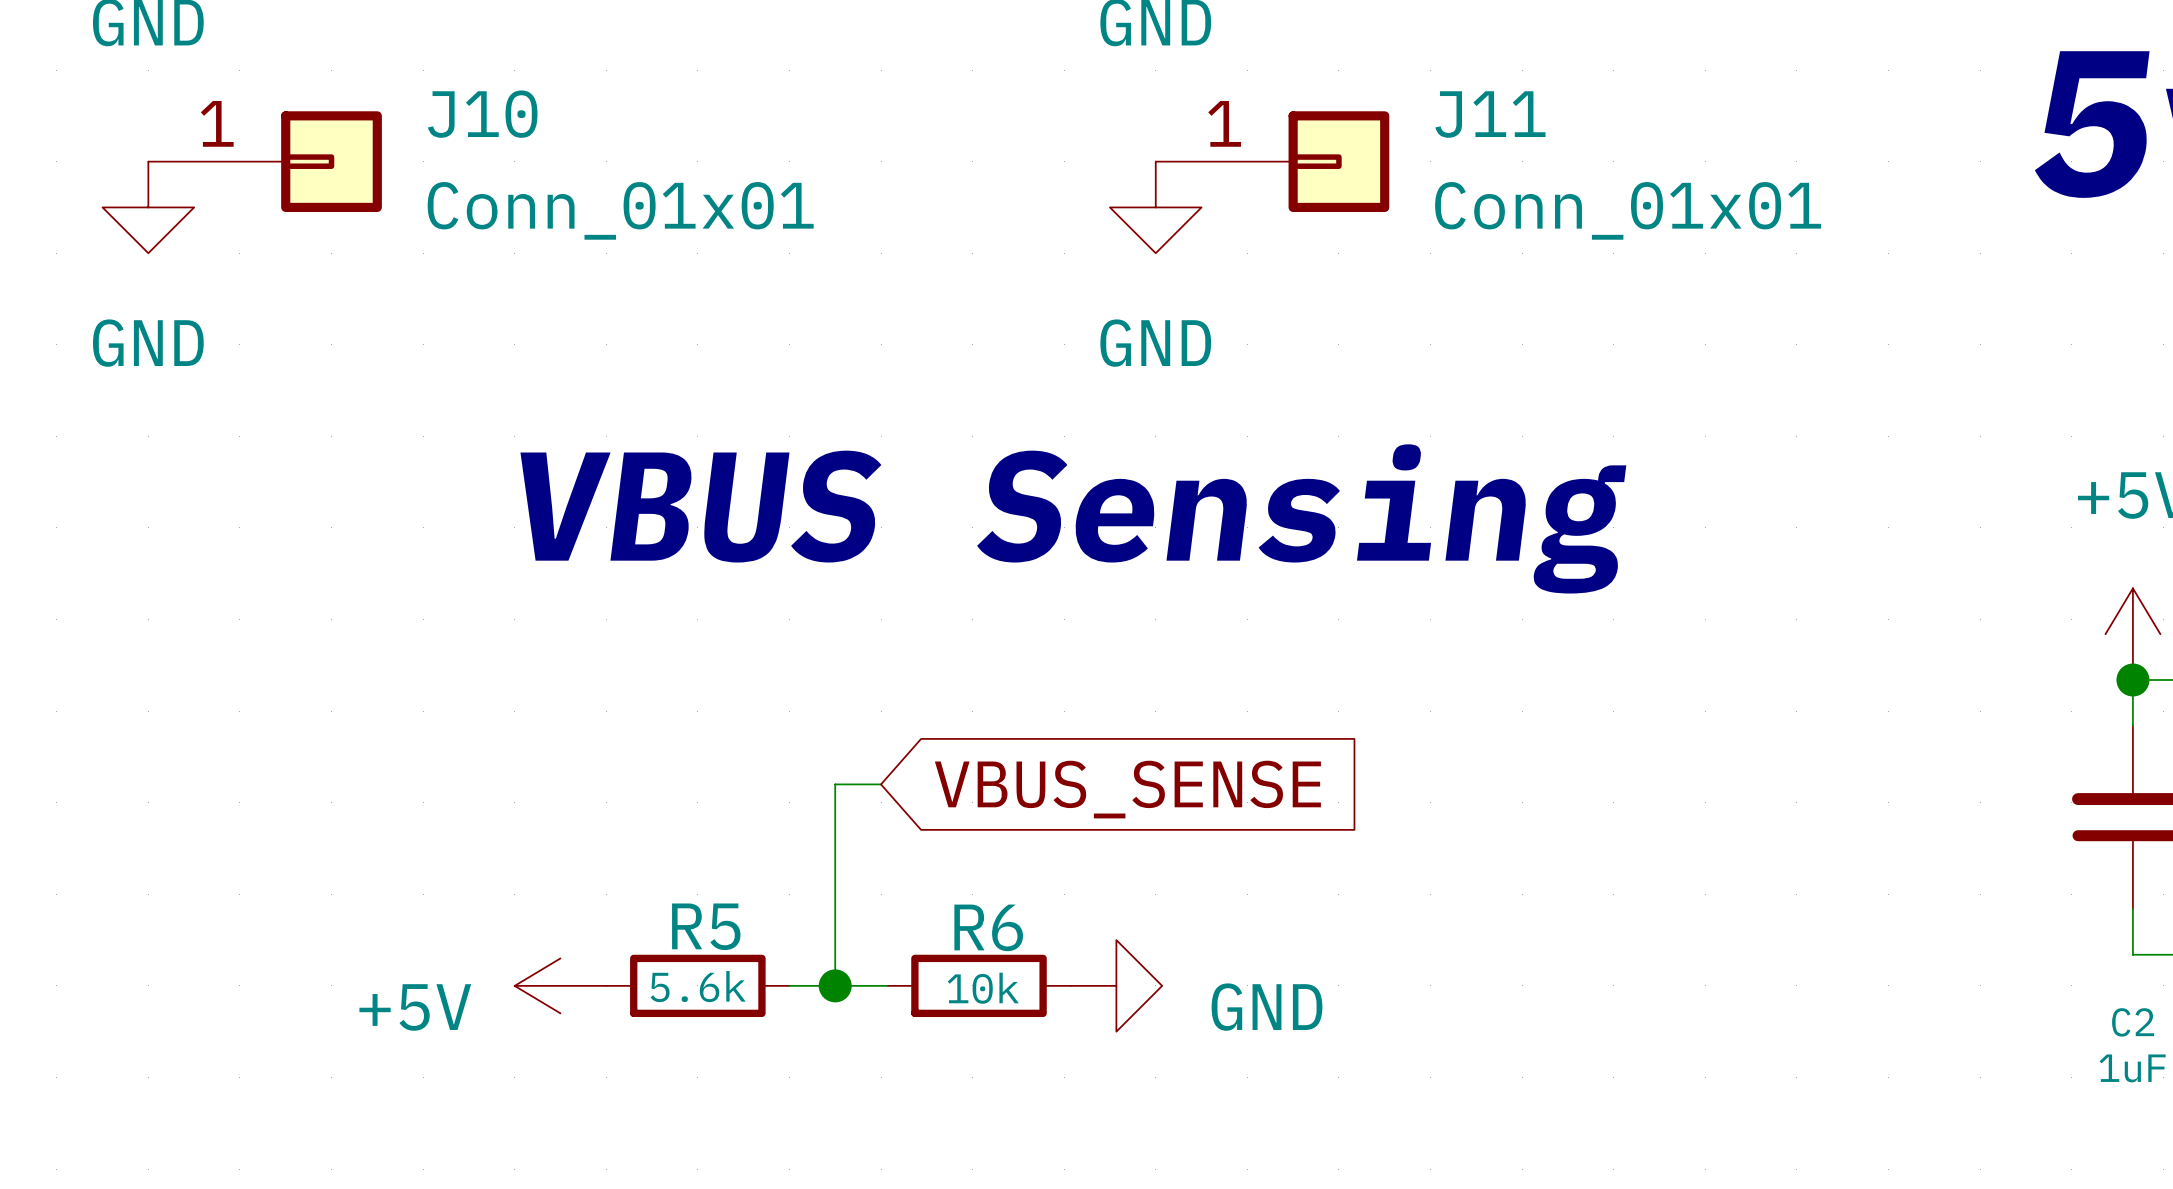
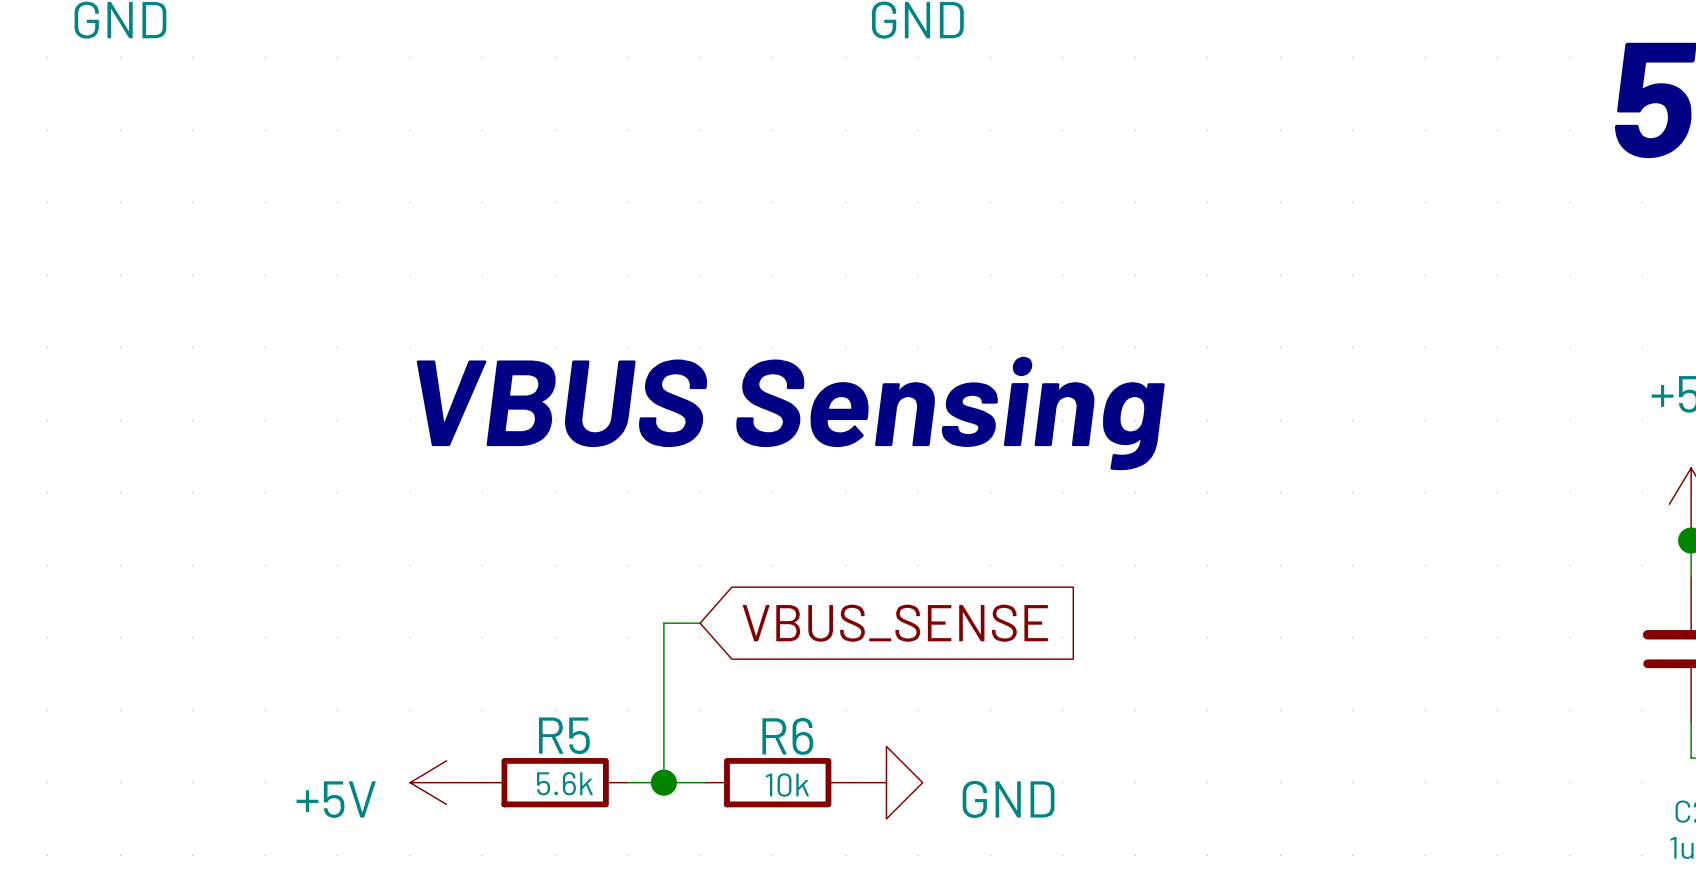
J10: Conn_01x01 (265, 161) -> none
J11: Conn_01x01 (1272, 161) -> none
power symbol: GND (148, 207) -> none
power symbol: GND (1155, 207) -> none

